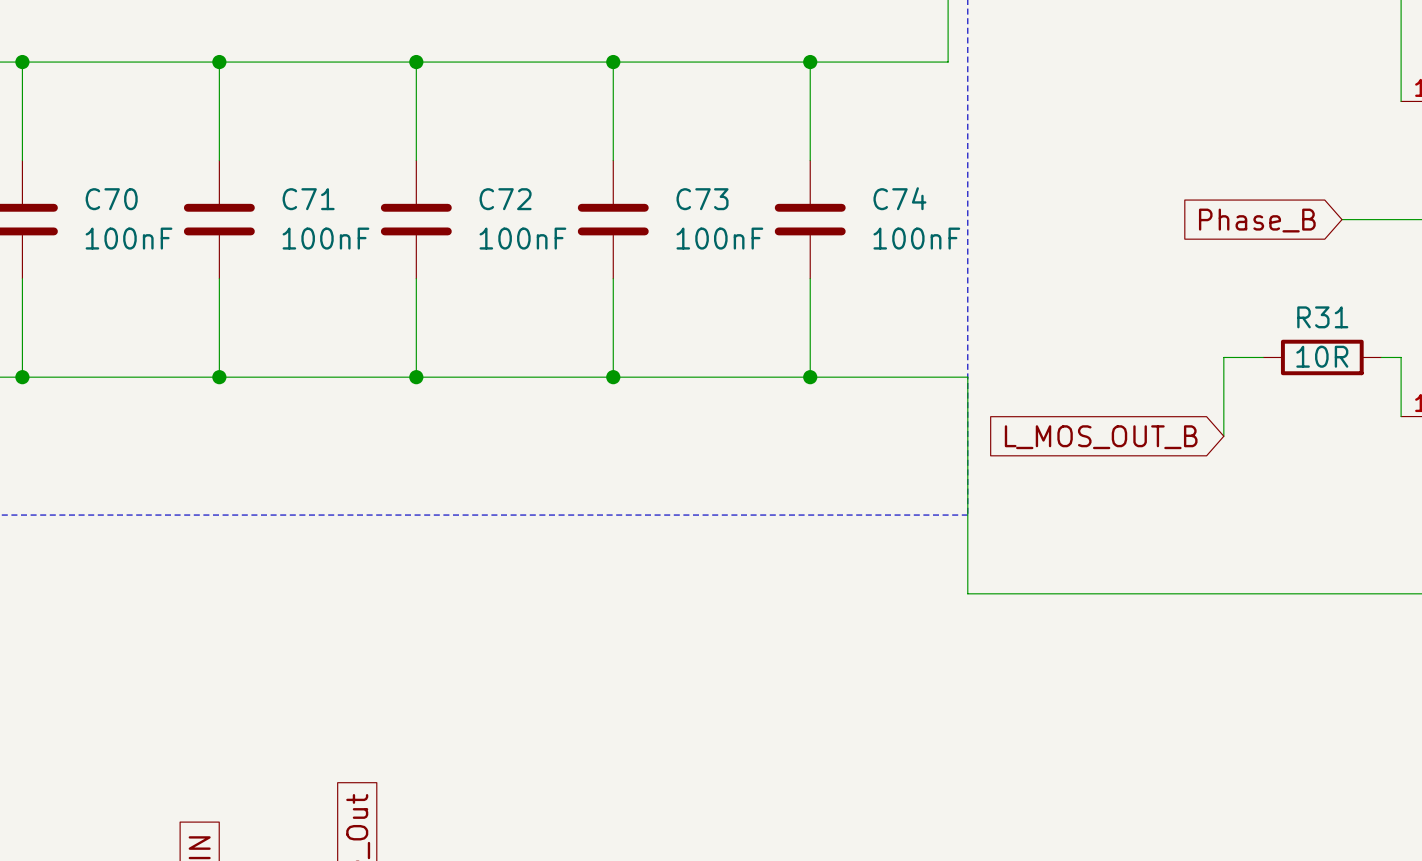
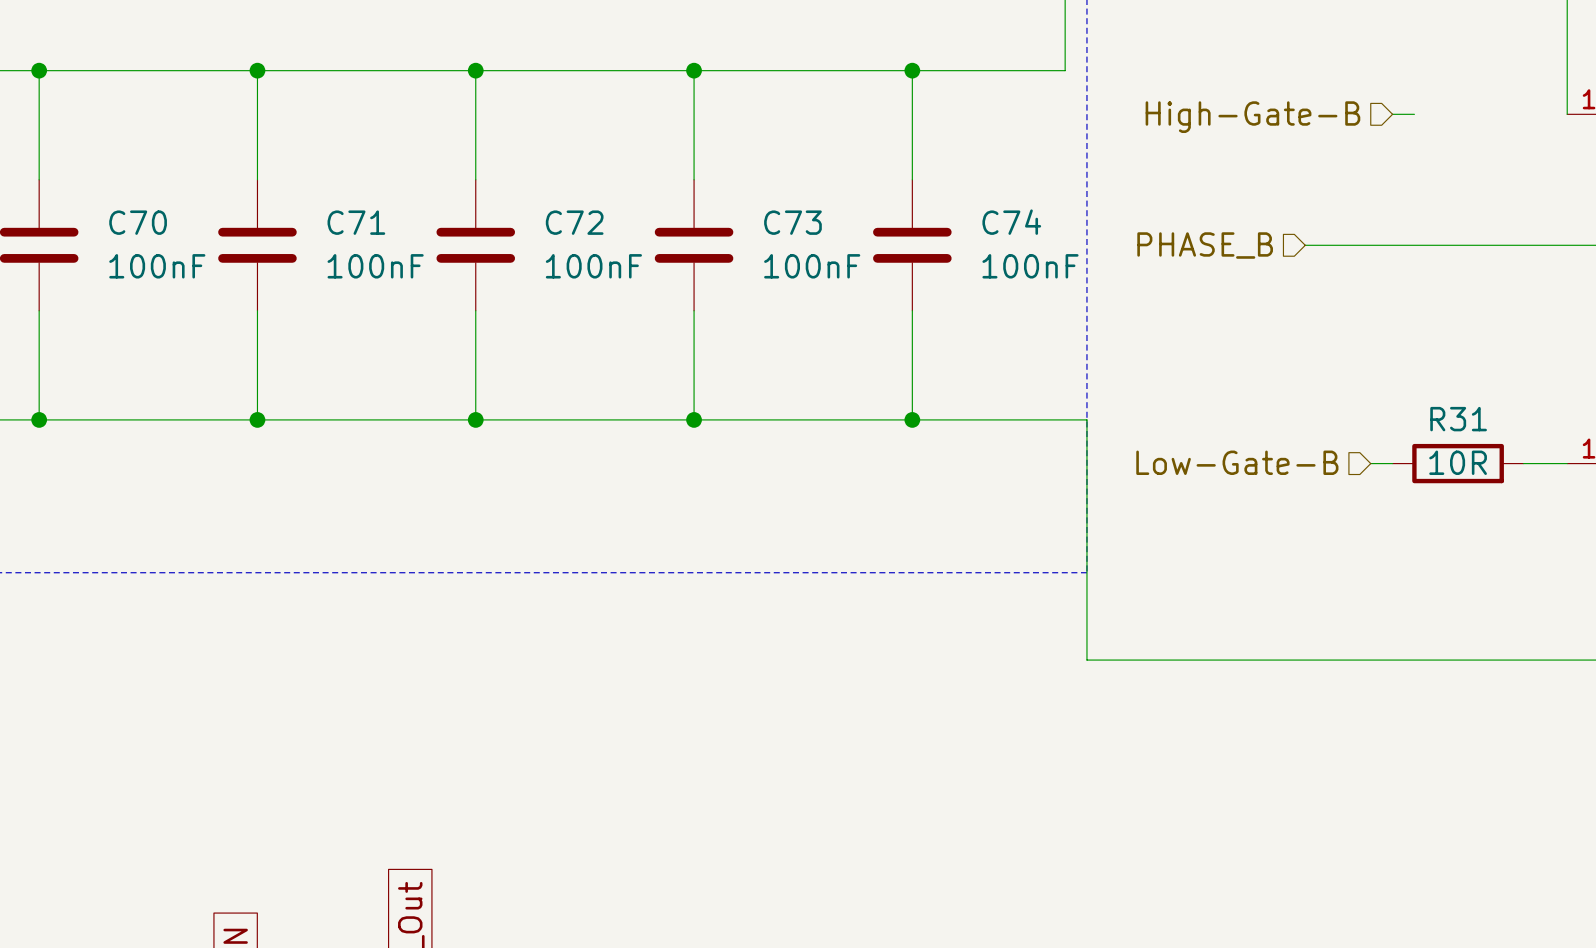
wire: none -> (1392, 114) (1414, 114)
hierarchical label: none -> High-Gate-B (1252, 117)
hierarchical label: none -> PHASE_B (1205, 245)
wire: none -> (1305, 245) (1501, 245)
global label: Phase_B (1257, 220) -> none
wire: (1263, 357) (1223, 357) (1223, 436) -> none
R31 position: (1322, 357) -> (1458, 463)
wire: (1381, 357) (1401, 357) (1401, 416) -> (1523, 463) (1567, 463)
hierarchical label: none -> Low-Gate-B (1237, 462)
wire: none -> (1370, 463) (1392, 463)
global label: L_MOS_OUT_B (1101, 437) -> none

